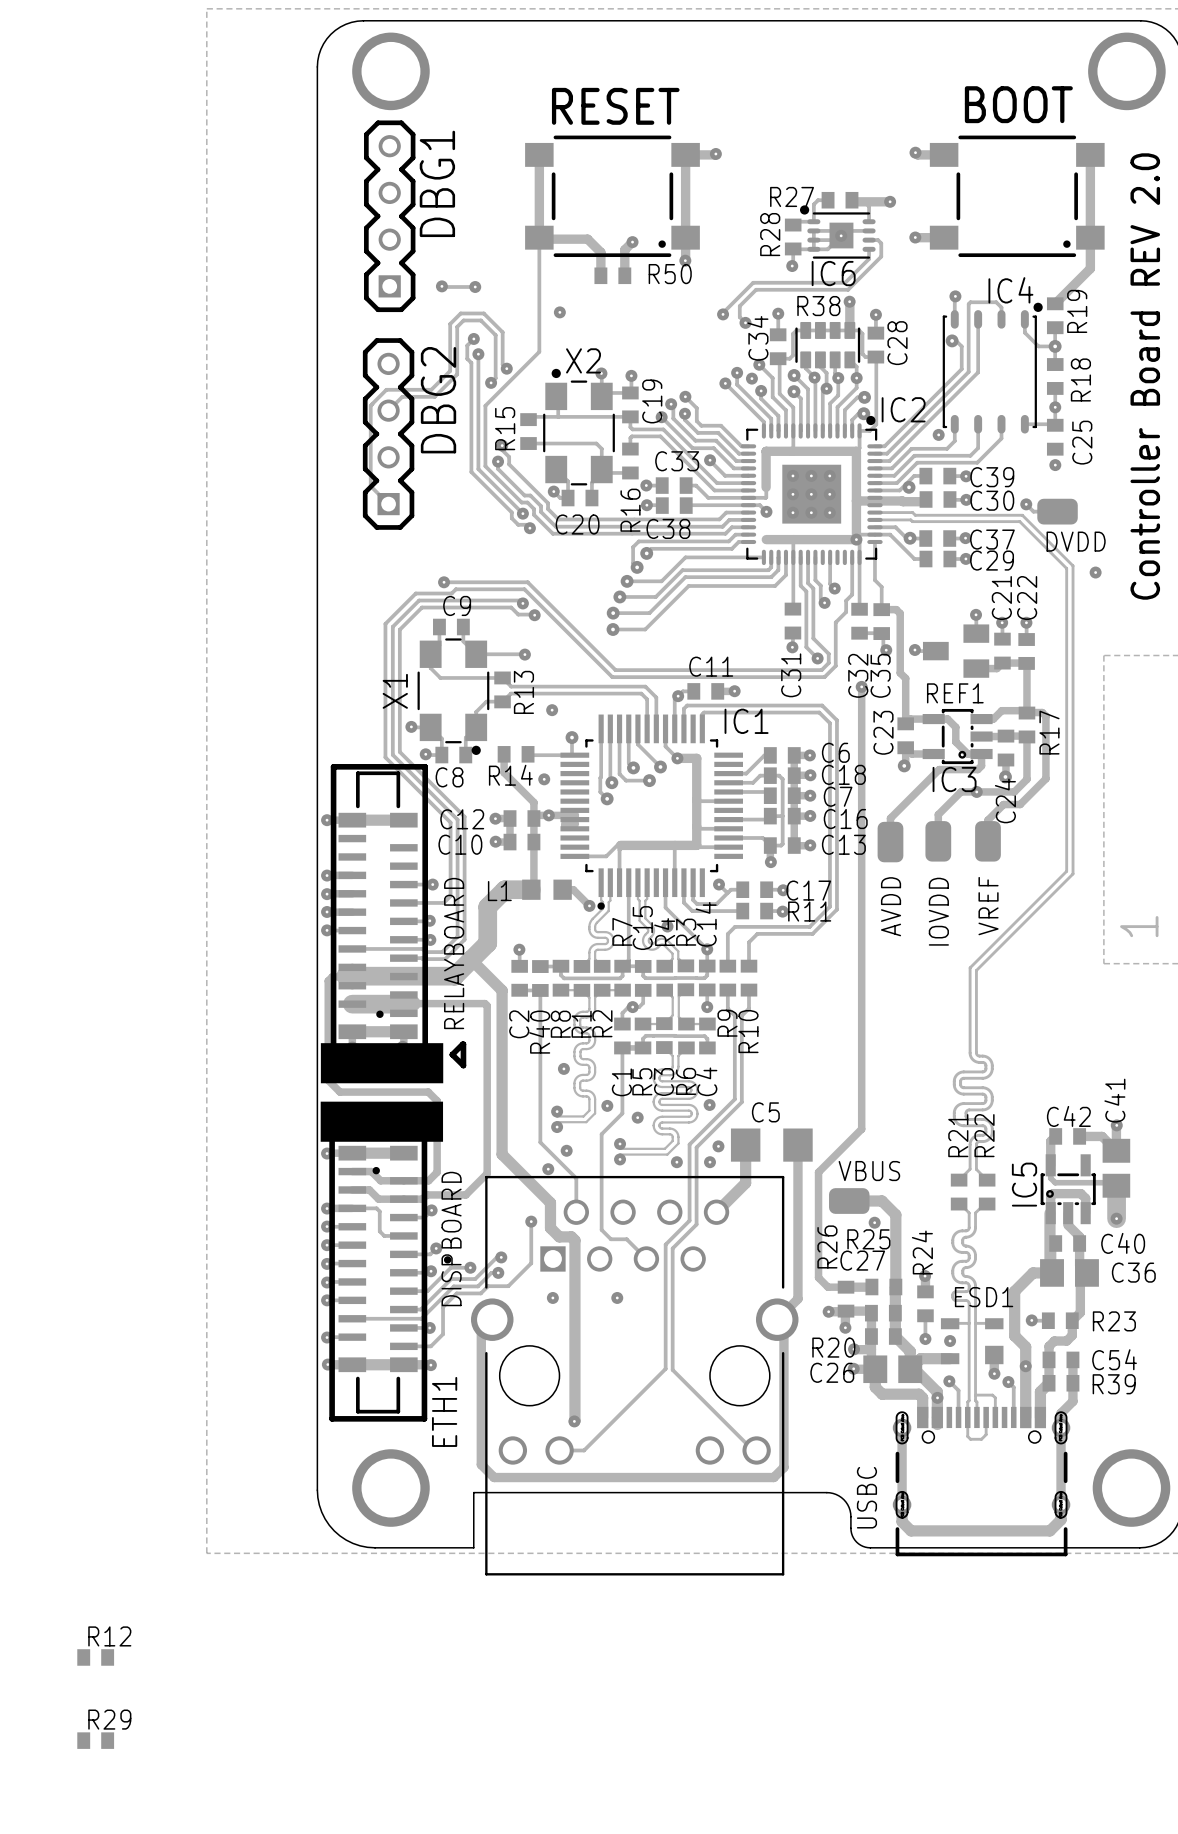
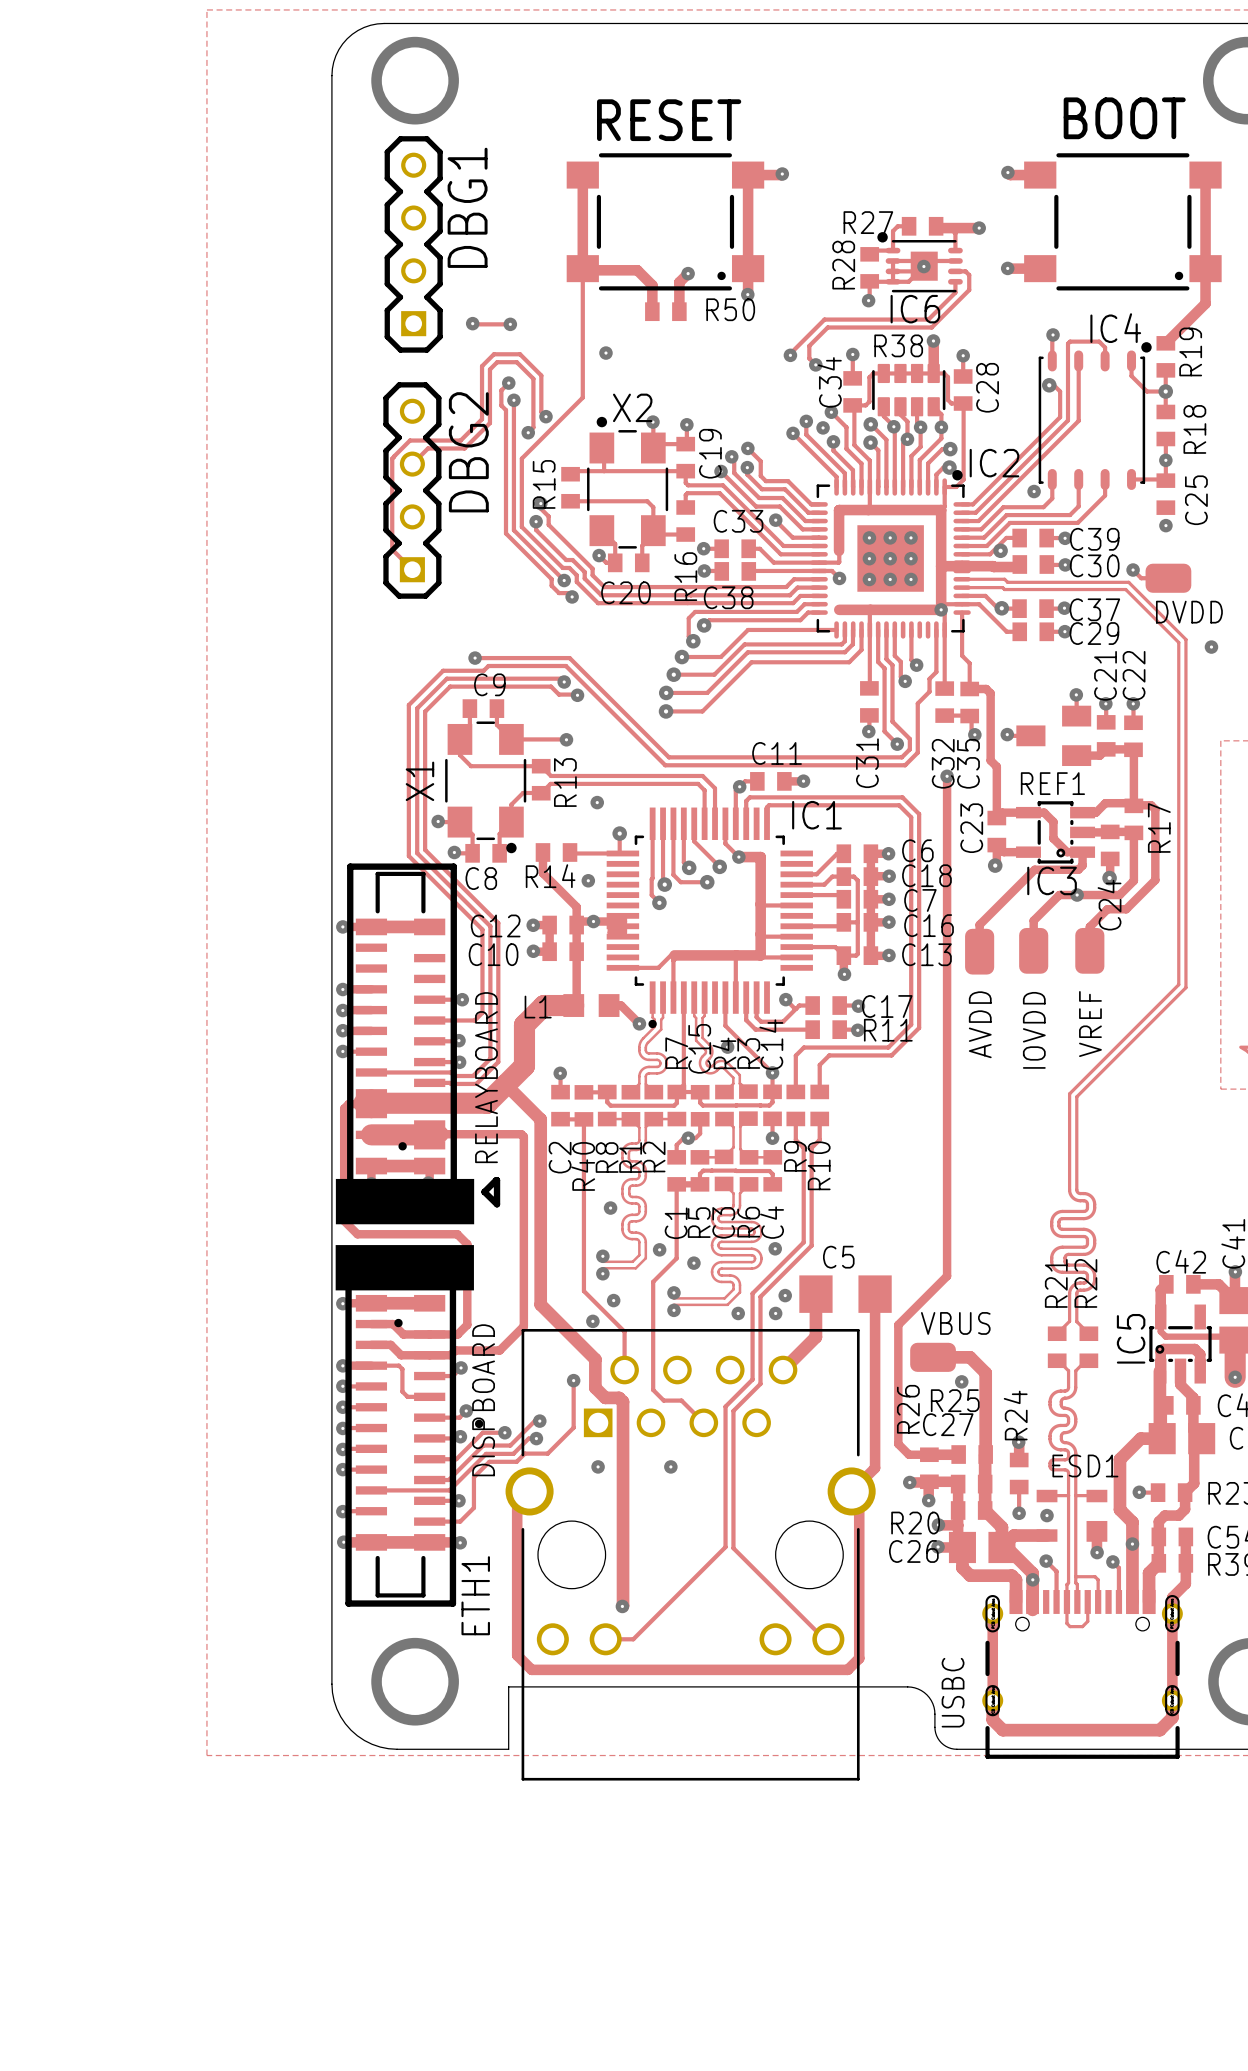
R12: (95, 1657) -> none
R29: (95, 1740) -> none

